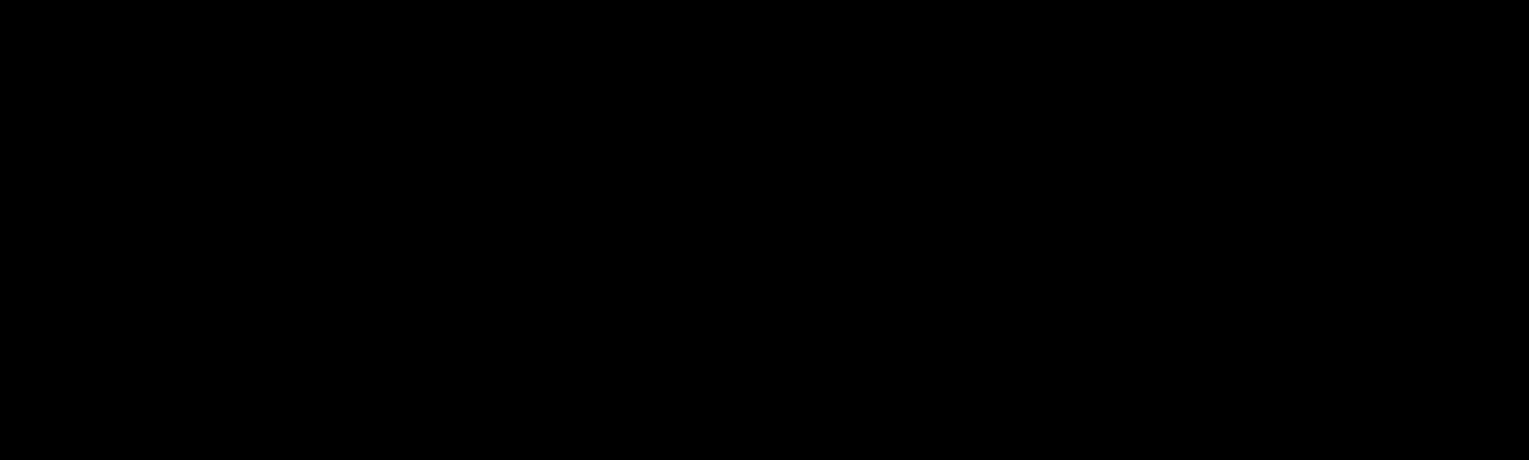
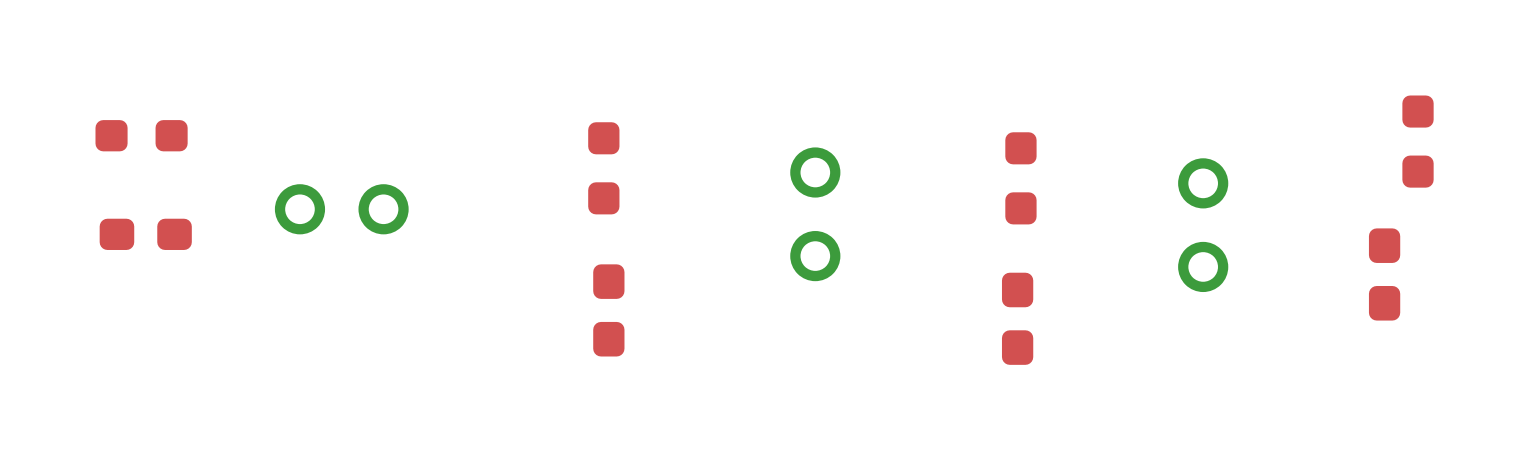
part: none -> (141, 135)
part: none -> (1418, 141)
part: none -> (603, 168)
part: none -> (1020, 178)
part: none -> (341, 209)
part: none -> (815, 214)
part: none -> (1203, 225)
part: none -> (145, 234)
part: none -> (1384, 274)
part: none -> (608, 310)
part: none -> (1017, 318)

